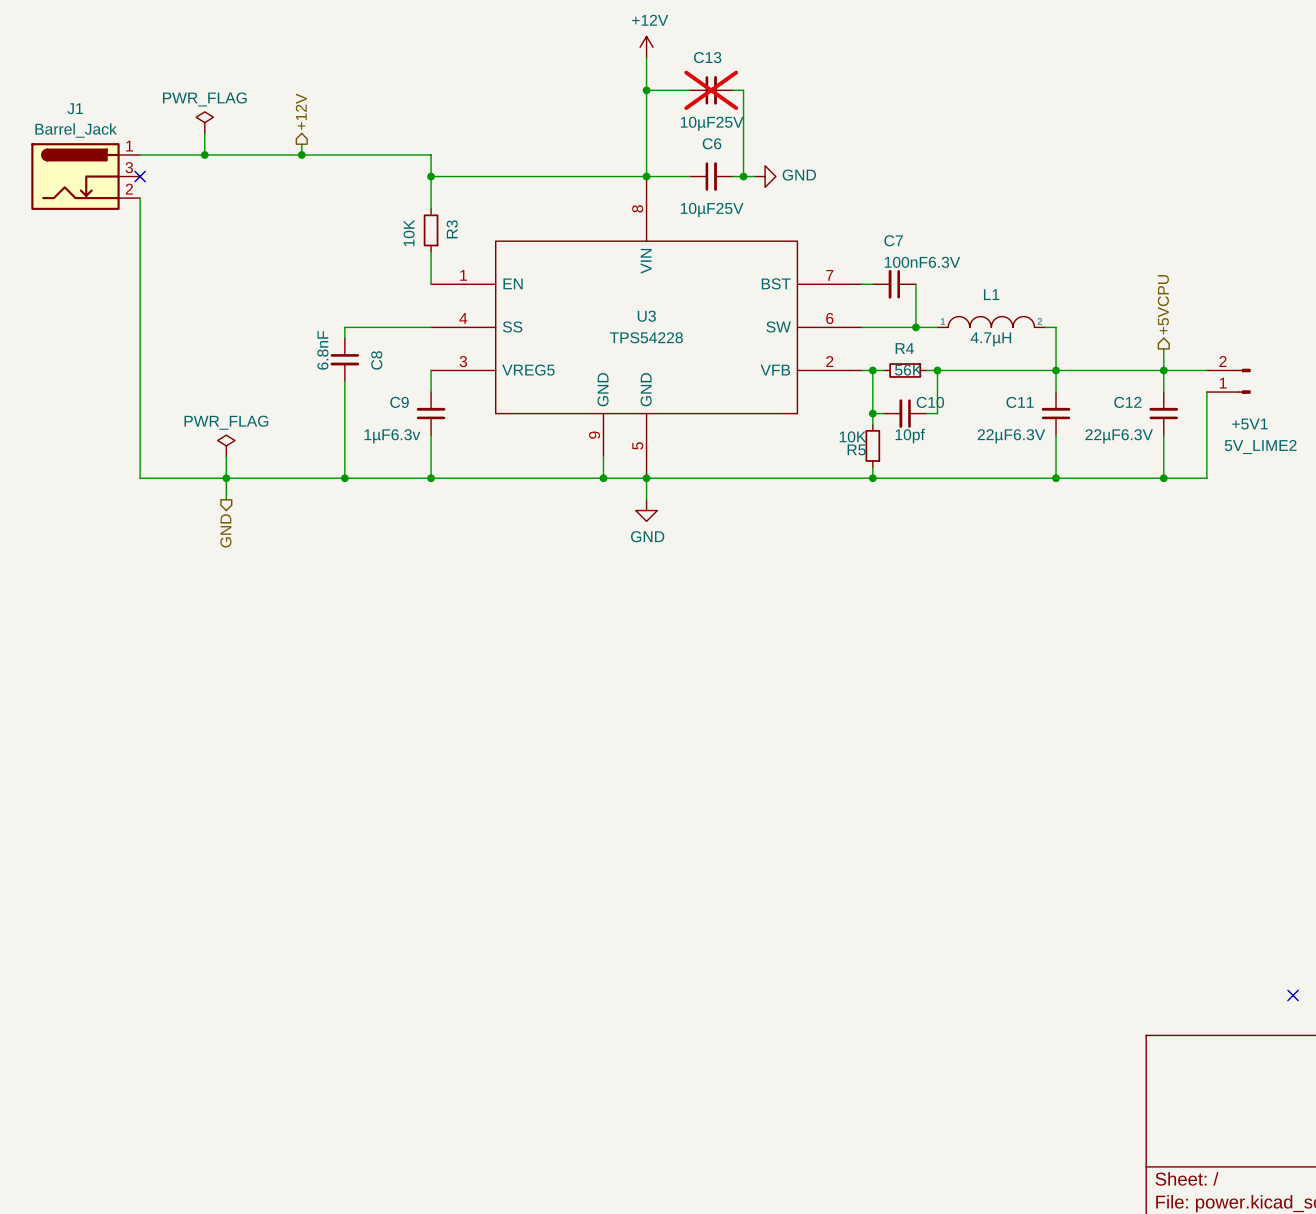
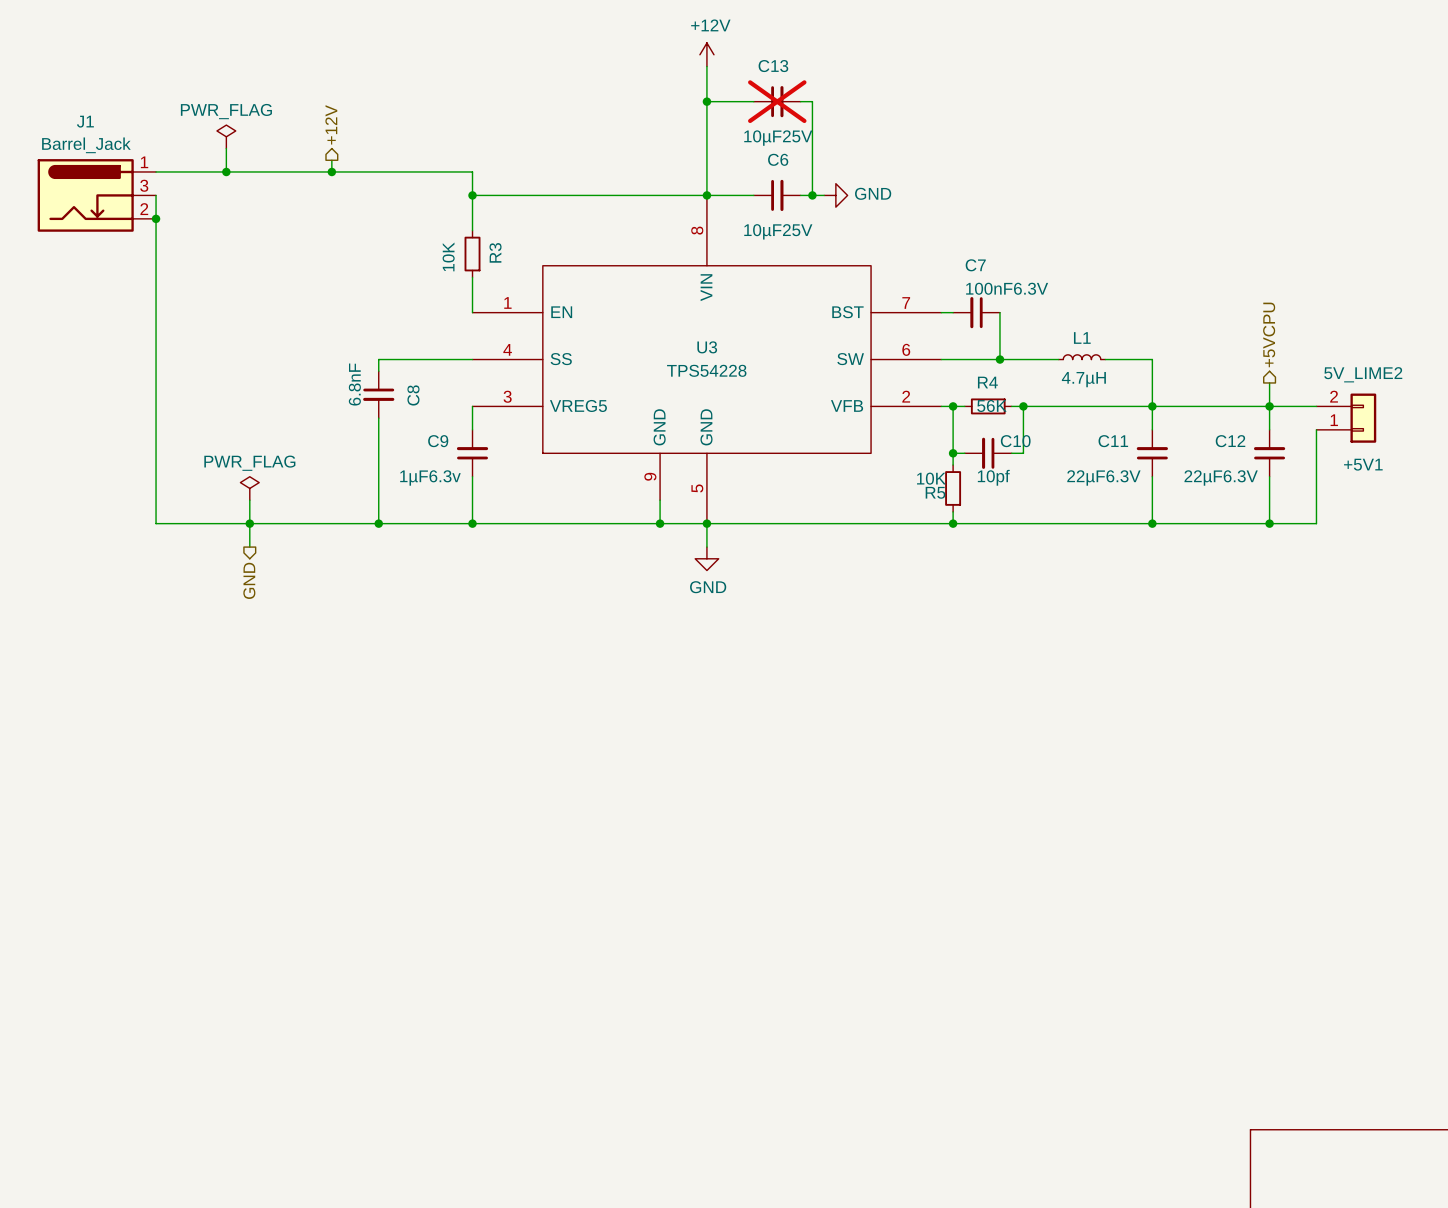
wire: none -> (156, 195) (156, 218)
no-connect mark: (140, 176) -> none
junction: none -> (156, 218)
L1 symbol: [937, 316, 1046, 328] -> [1058, 354, 1106, 360]
wire: none -> (1023, 359) (1058, 359)
wire: none -> (1105, 359) (1140, 359)
+5V1 symbol: [1206, 368, 1251, 394] -> [1316, 393, 1377, 443]
+5V1 value position: 5V_LIME2 (1260, 446) -> 5V_LIME2 (1363, 374)
no-connect mark: (1293, 995) -> none

